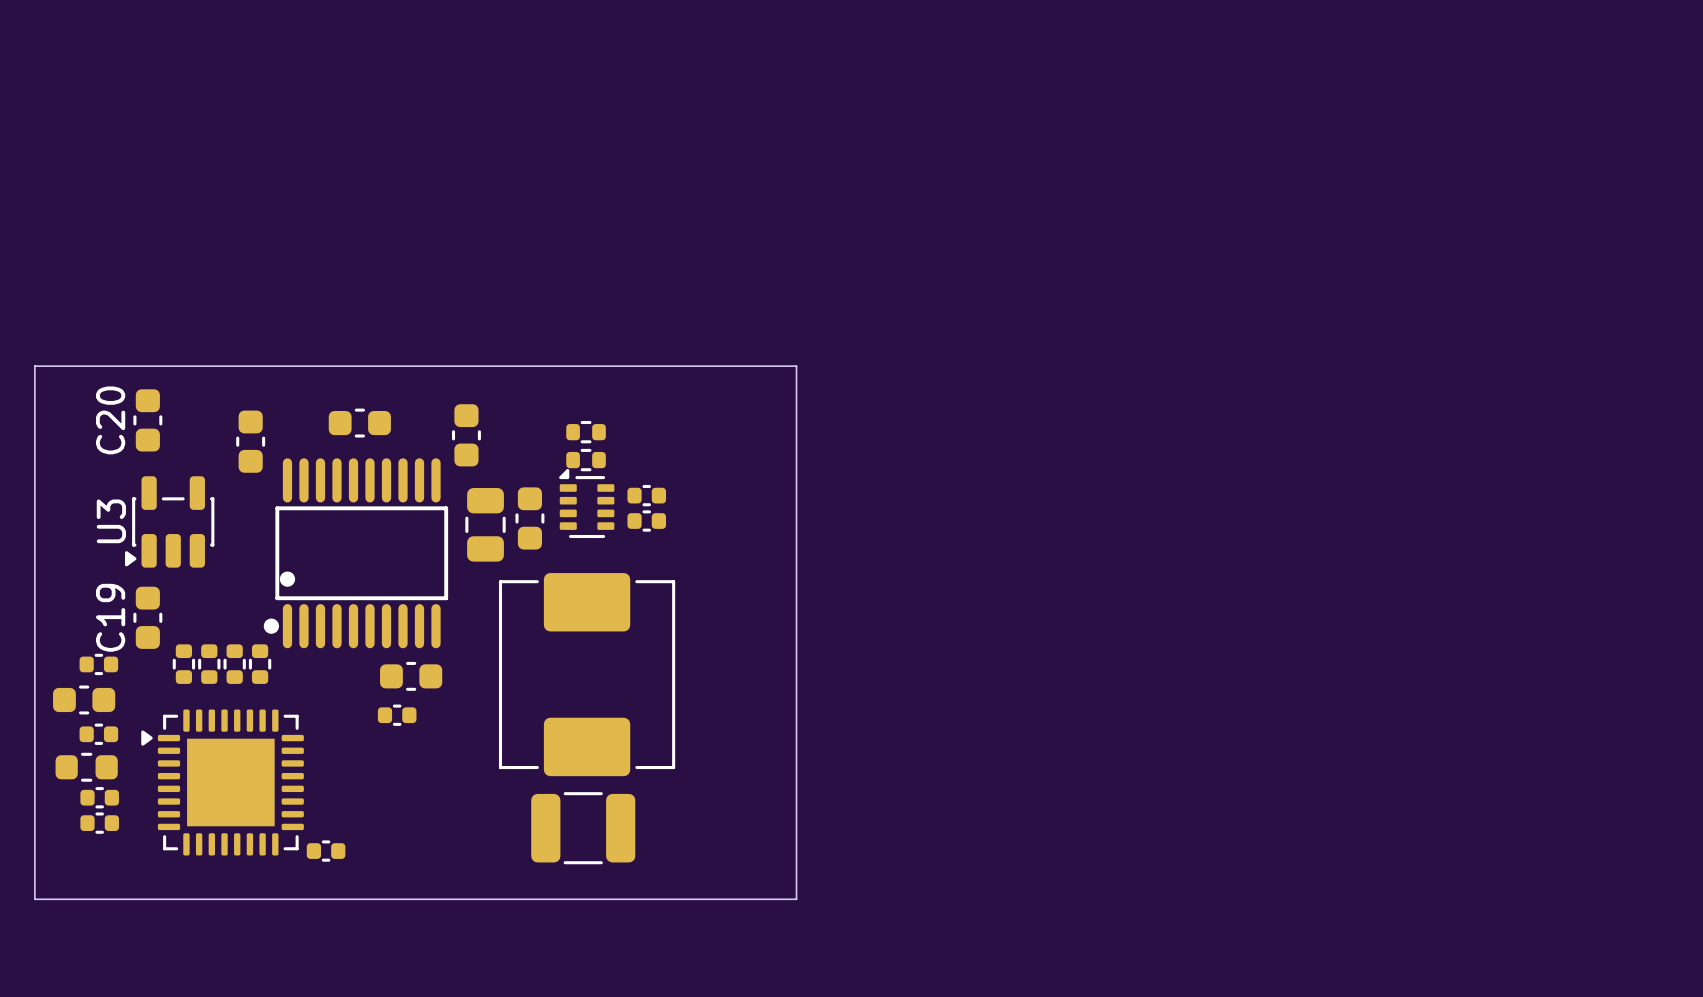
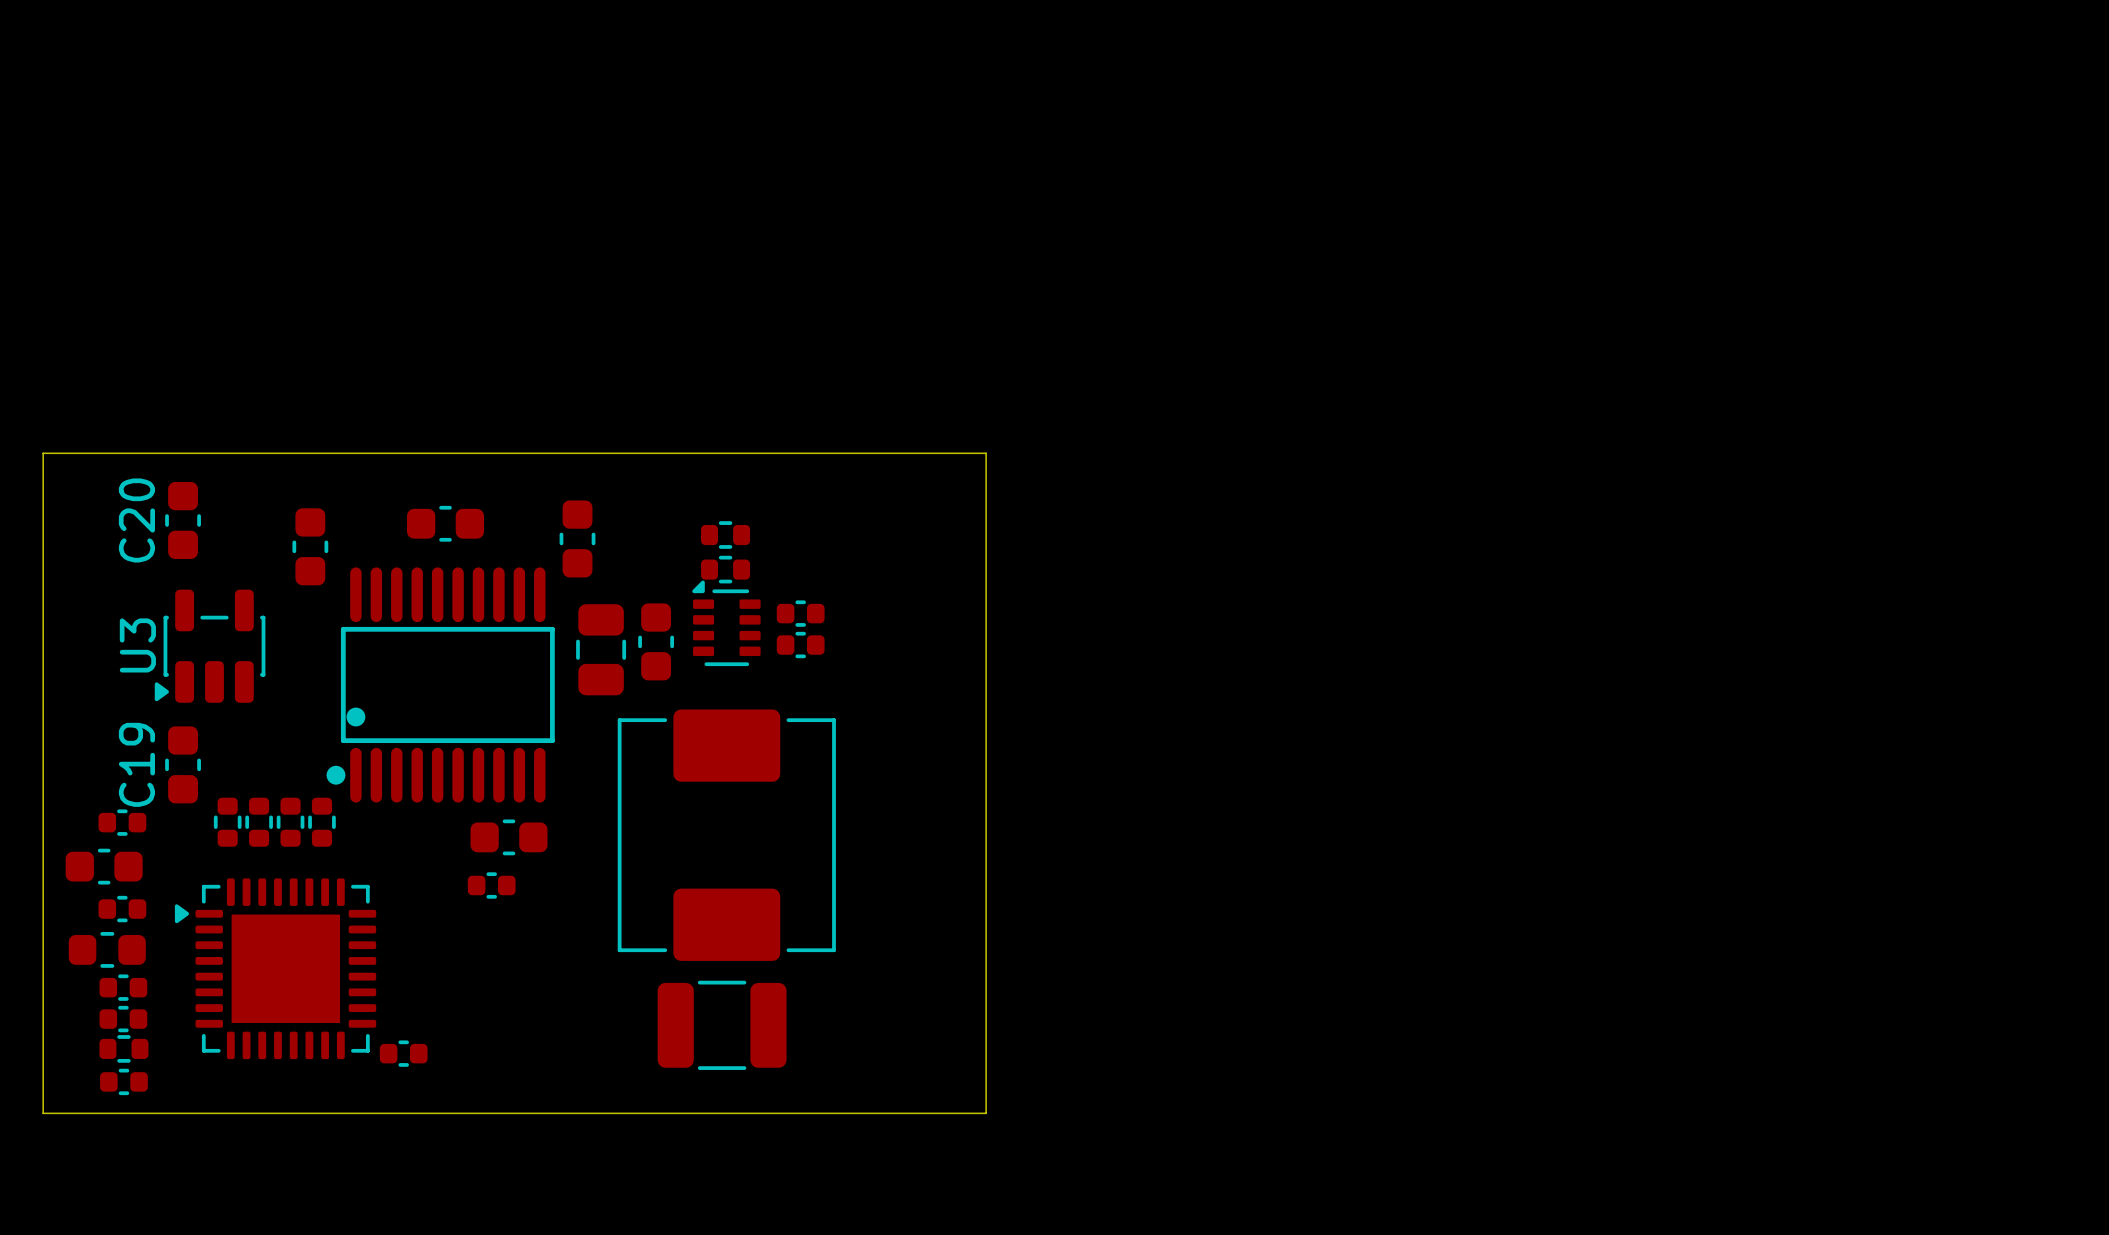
part: none -> (123, 1048)
part: none -> (123, 1081)

